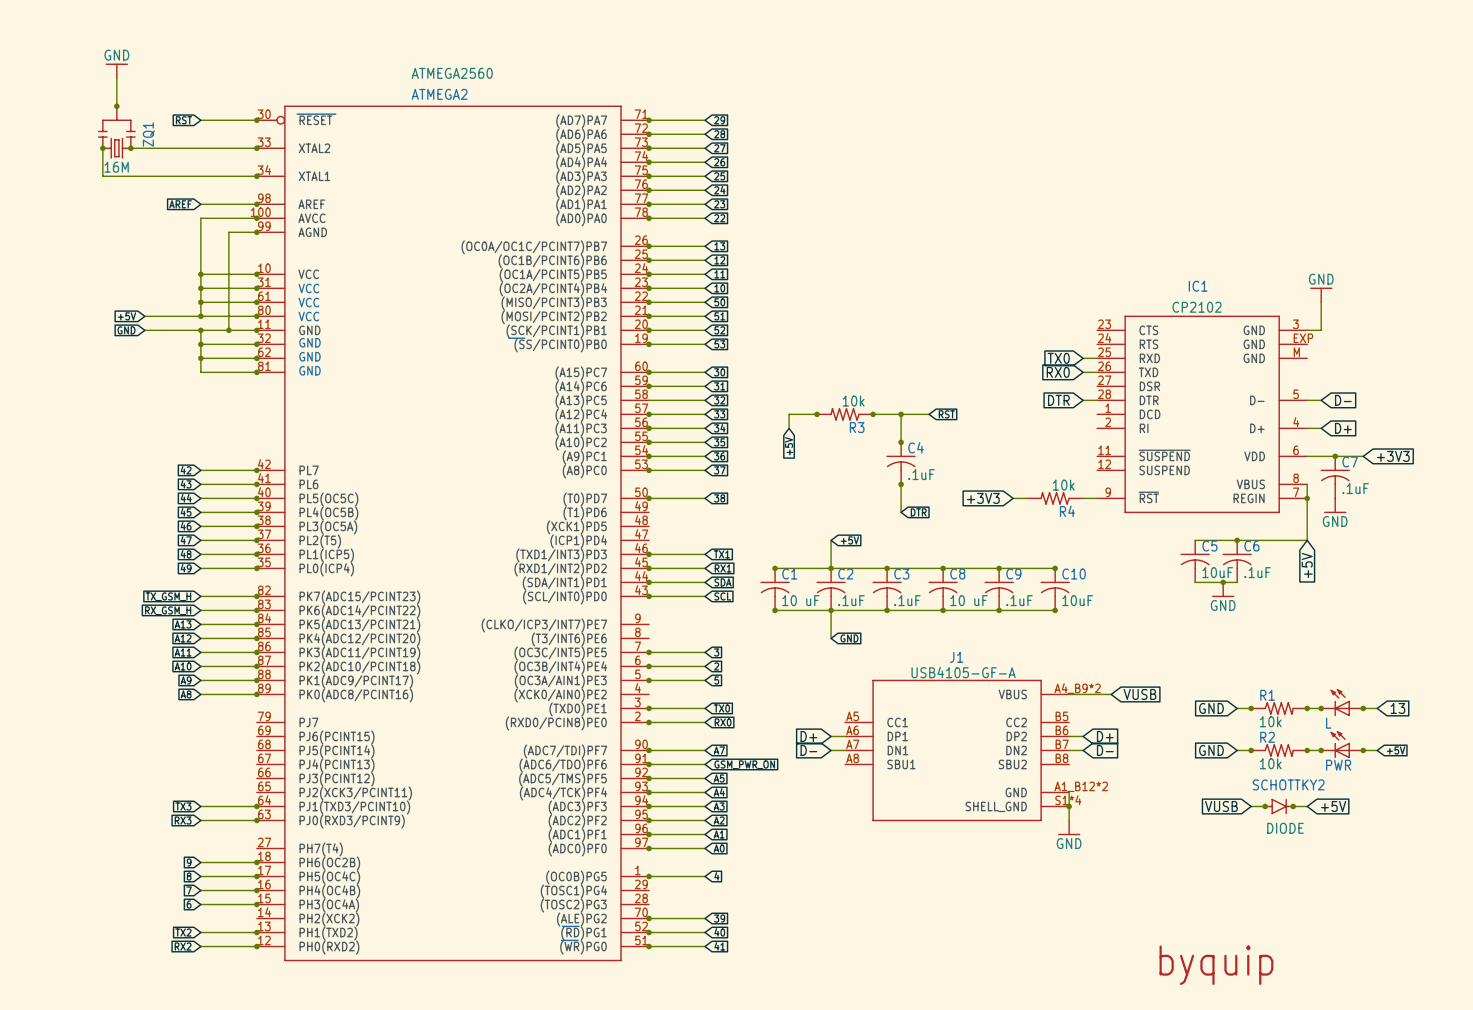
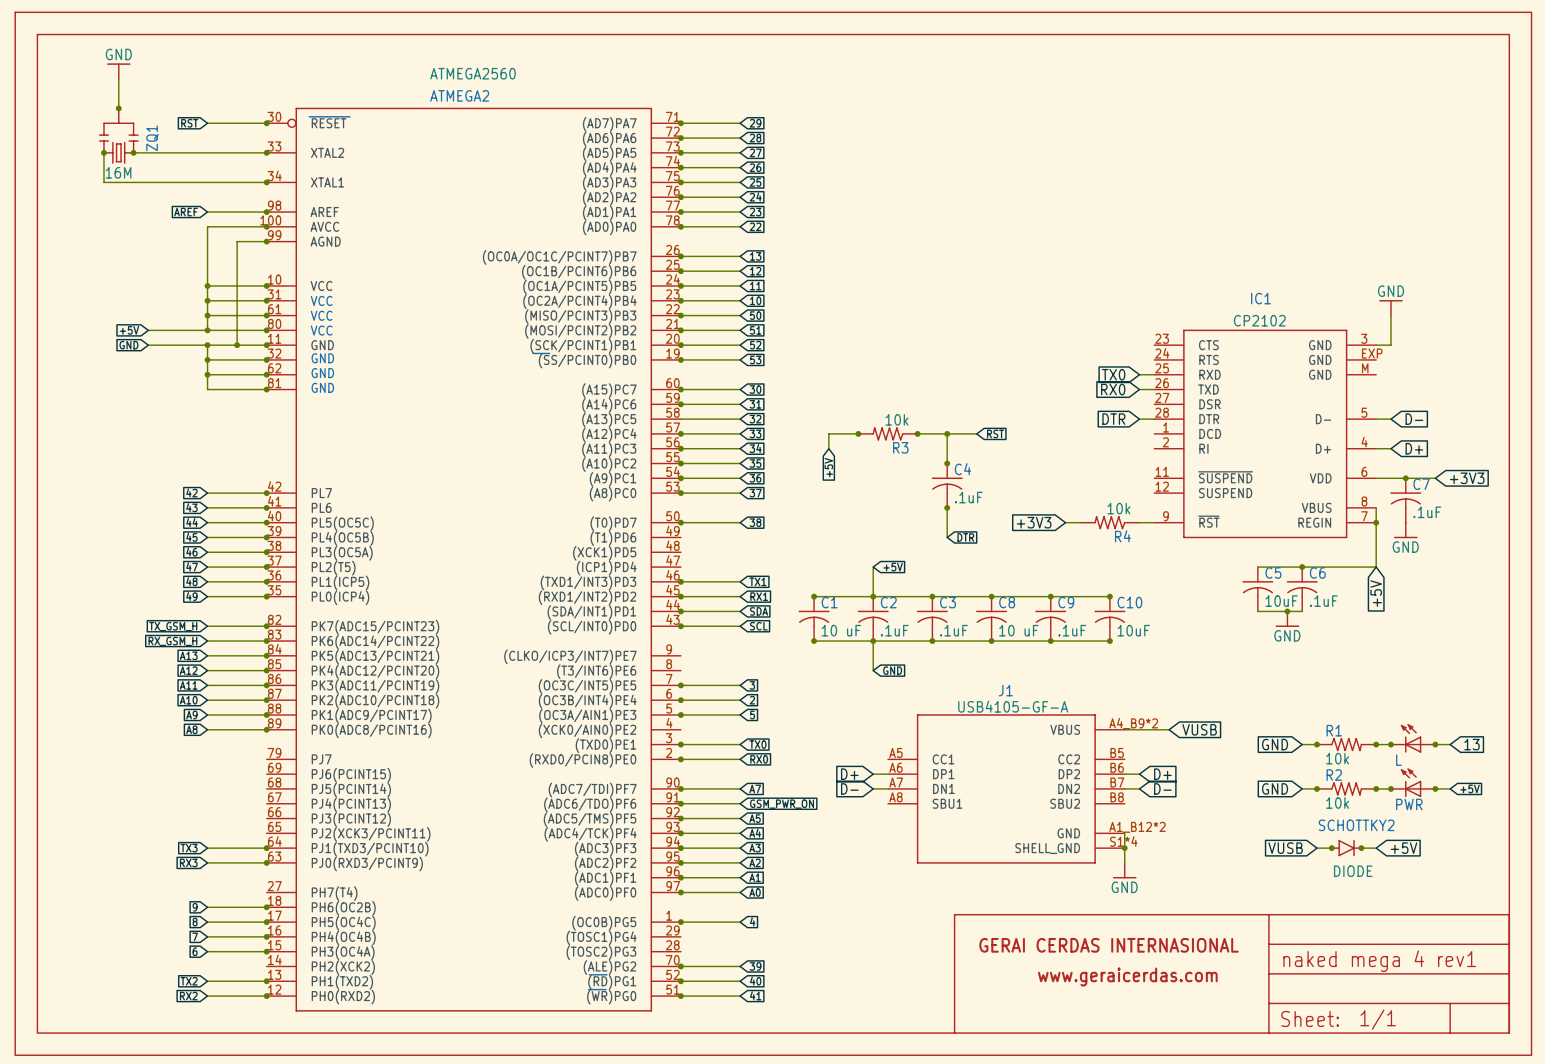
part: none -> (773, 533)
text: byquip (1216, 965) -> none

